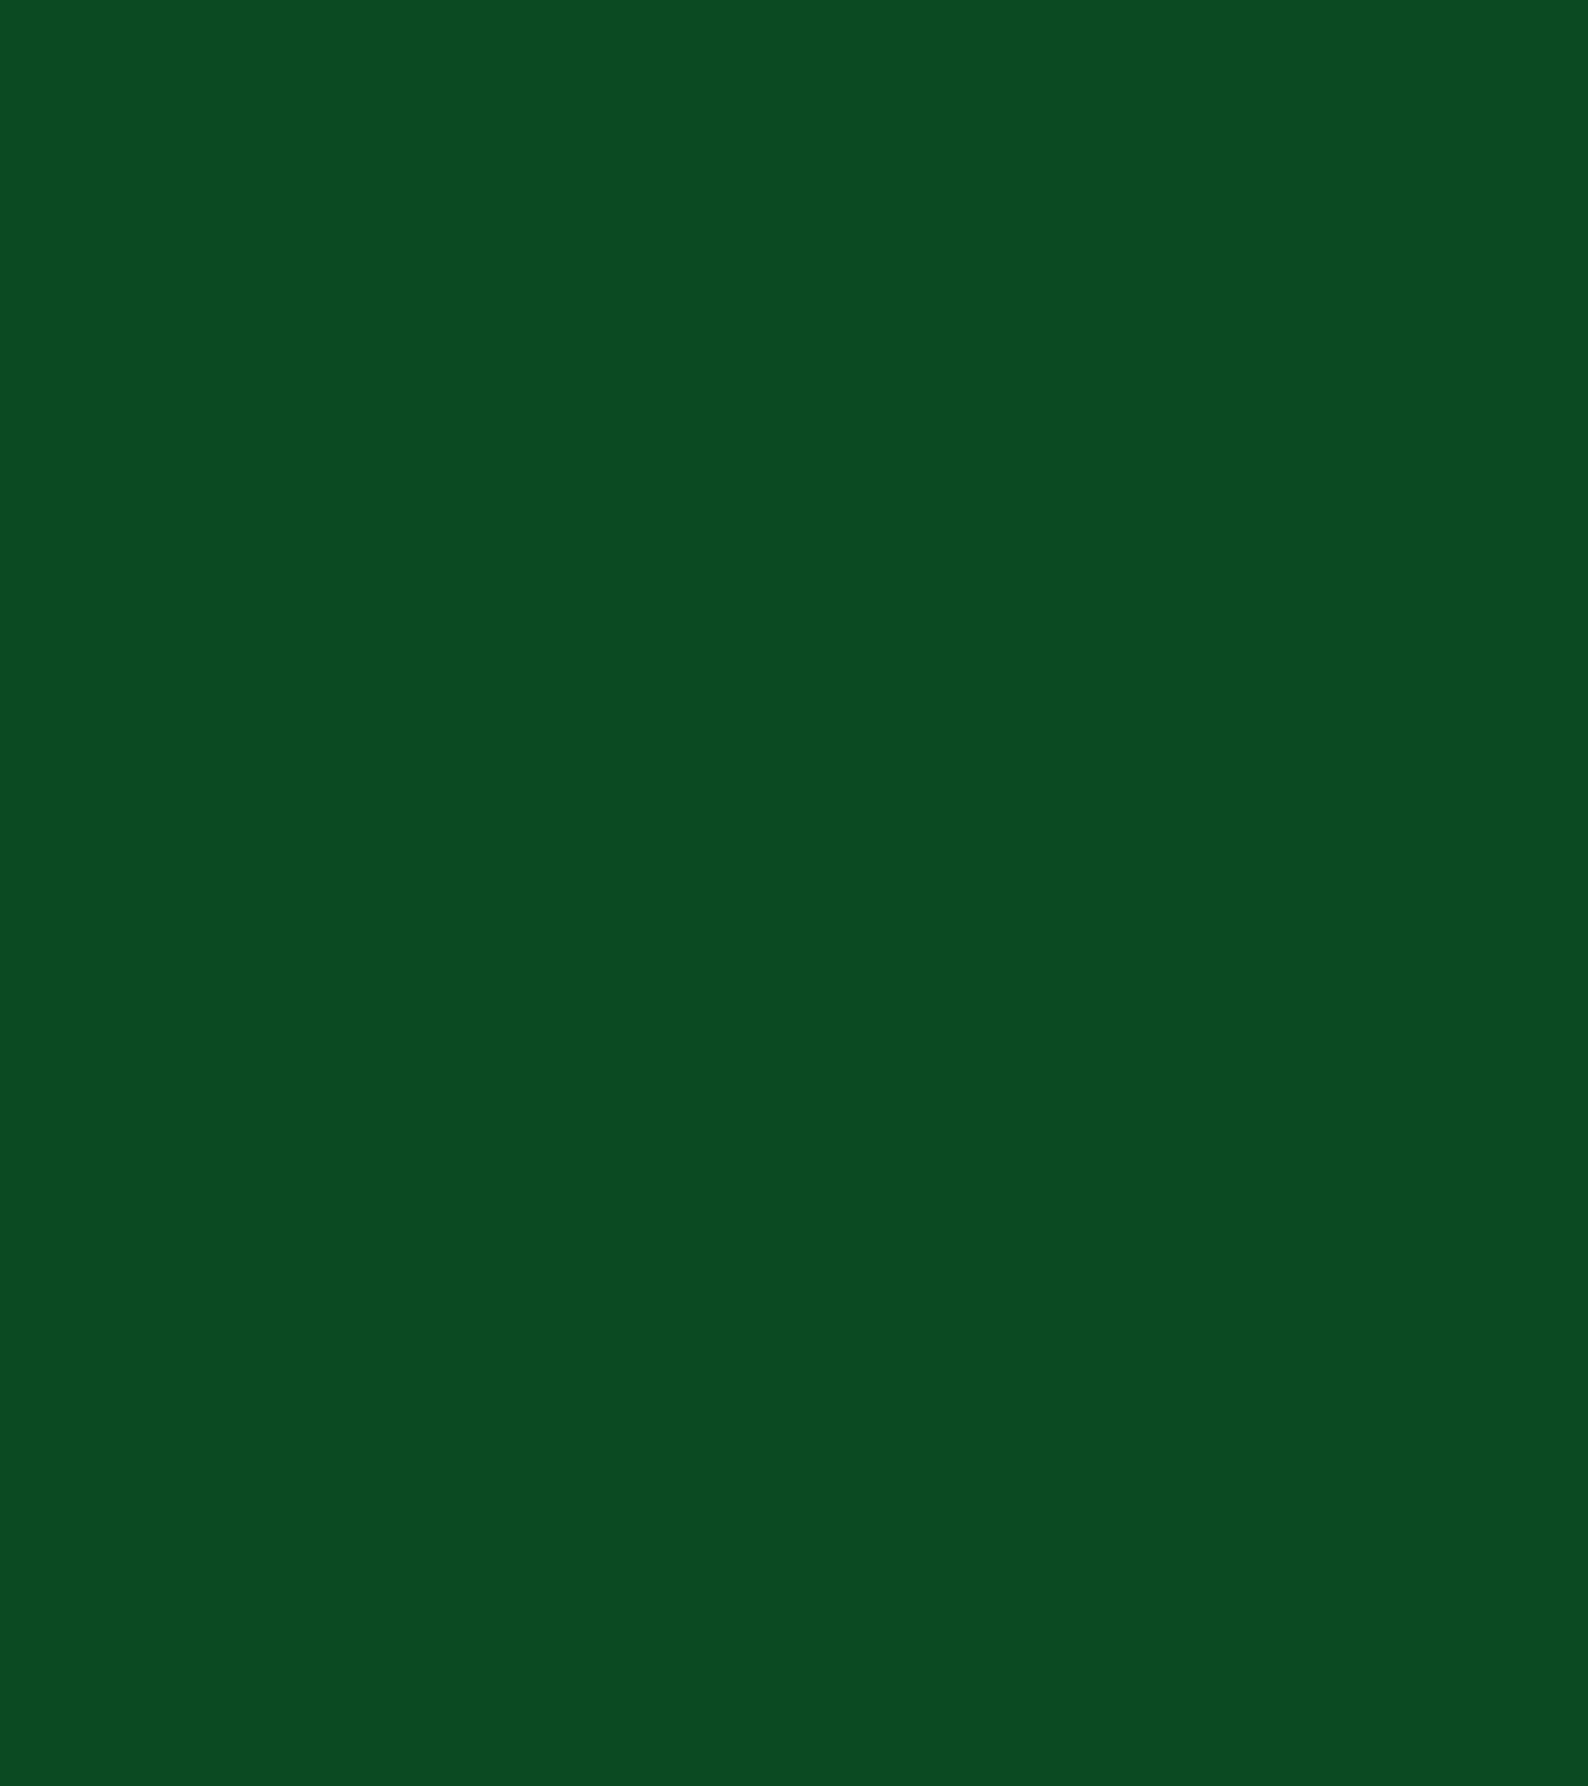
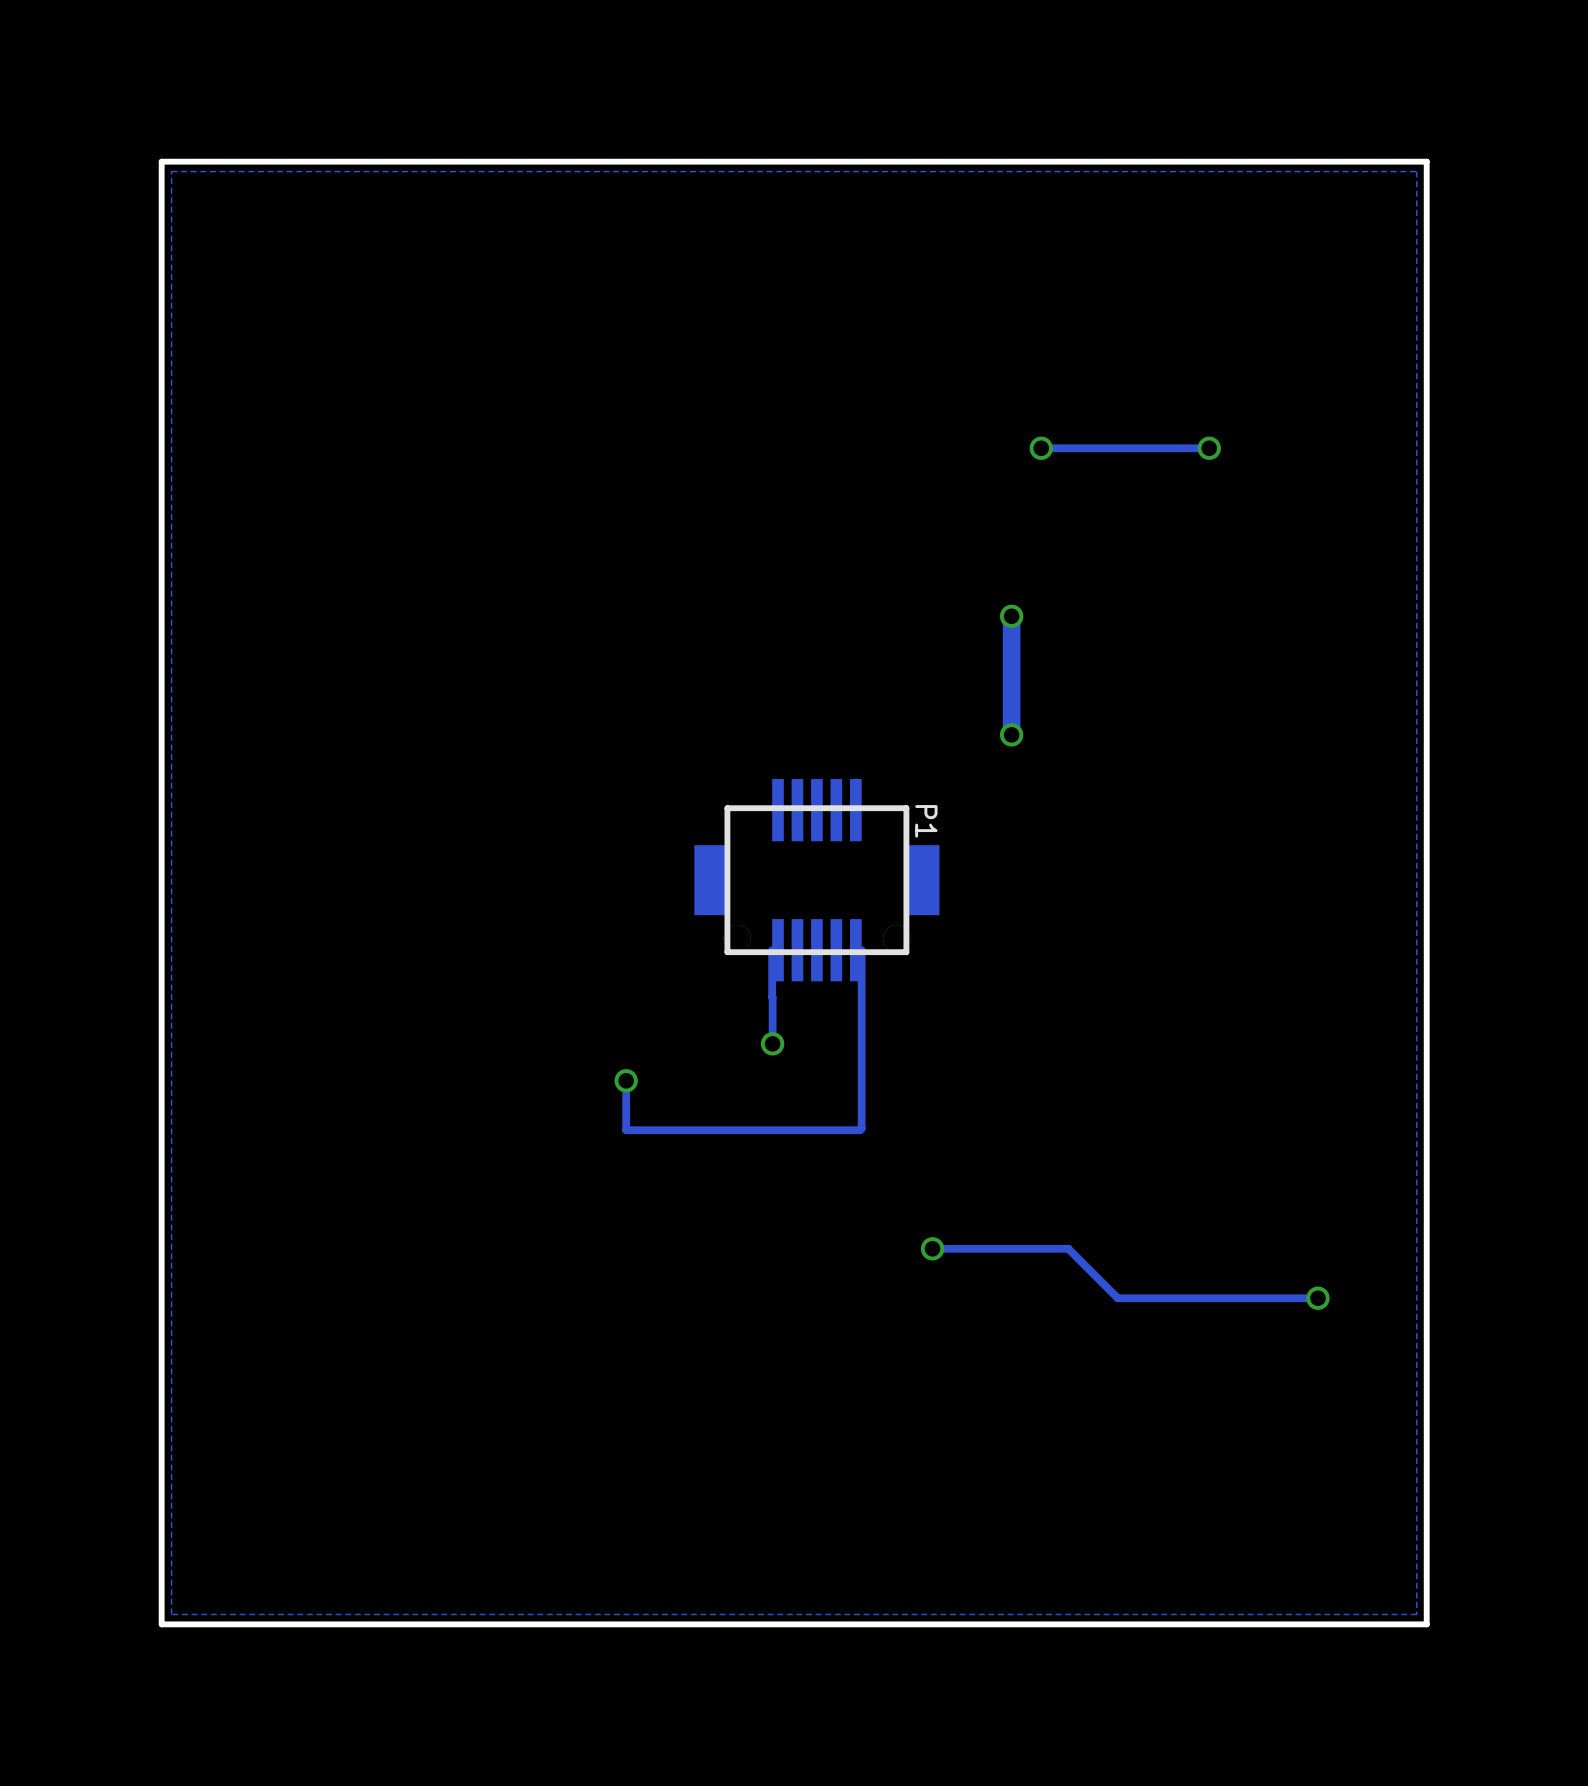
board edge: none -> (1426, 161) (1426, 1624) (161, 1624) (161, 161) (1426, 161)
zone outline: none -> (1416, 171) (171, 171) (171, 1614) (1416, 1614) (1416, 171)
via: none -> (1041, 448)
track: none -> (1209, 448) (1041, 448)
via: none -> (1209, 448)
track: none -> (1011, 616) (1011, 734)
via: none -> (1011, 616)
via: none -> (1011, 734)
P1: none -> (816, 880)
track: none -> (772, 950) (772, 996)
track: none -> (861, 950) (861, 1128) (859, 1130) (626, 1130) (626, 1080)
track: none -> (772, 997) (772, 1043)
via: none -> (772, 1043)
via: none -> (626, 1080)
track: none -> (932, 1248) (1068, 1248) (1117, 1298) (1317, 1298)
via: none -> (932, 1248)
via: none -> (1317, 1298)

